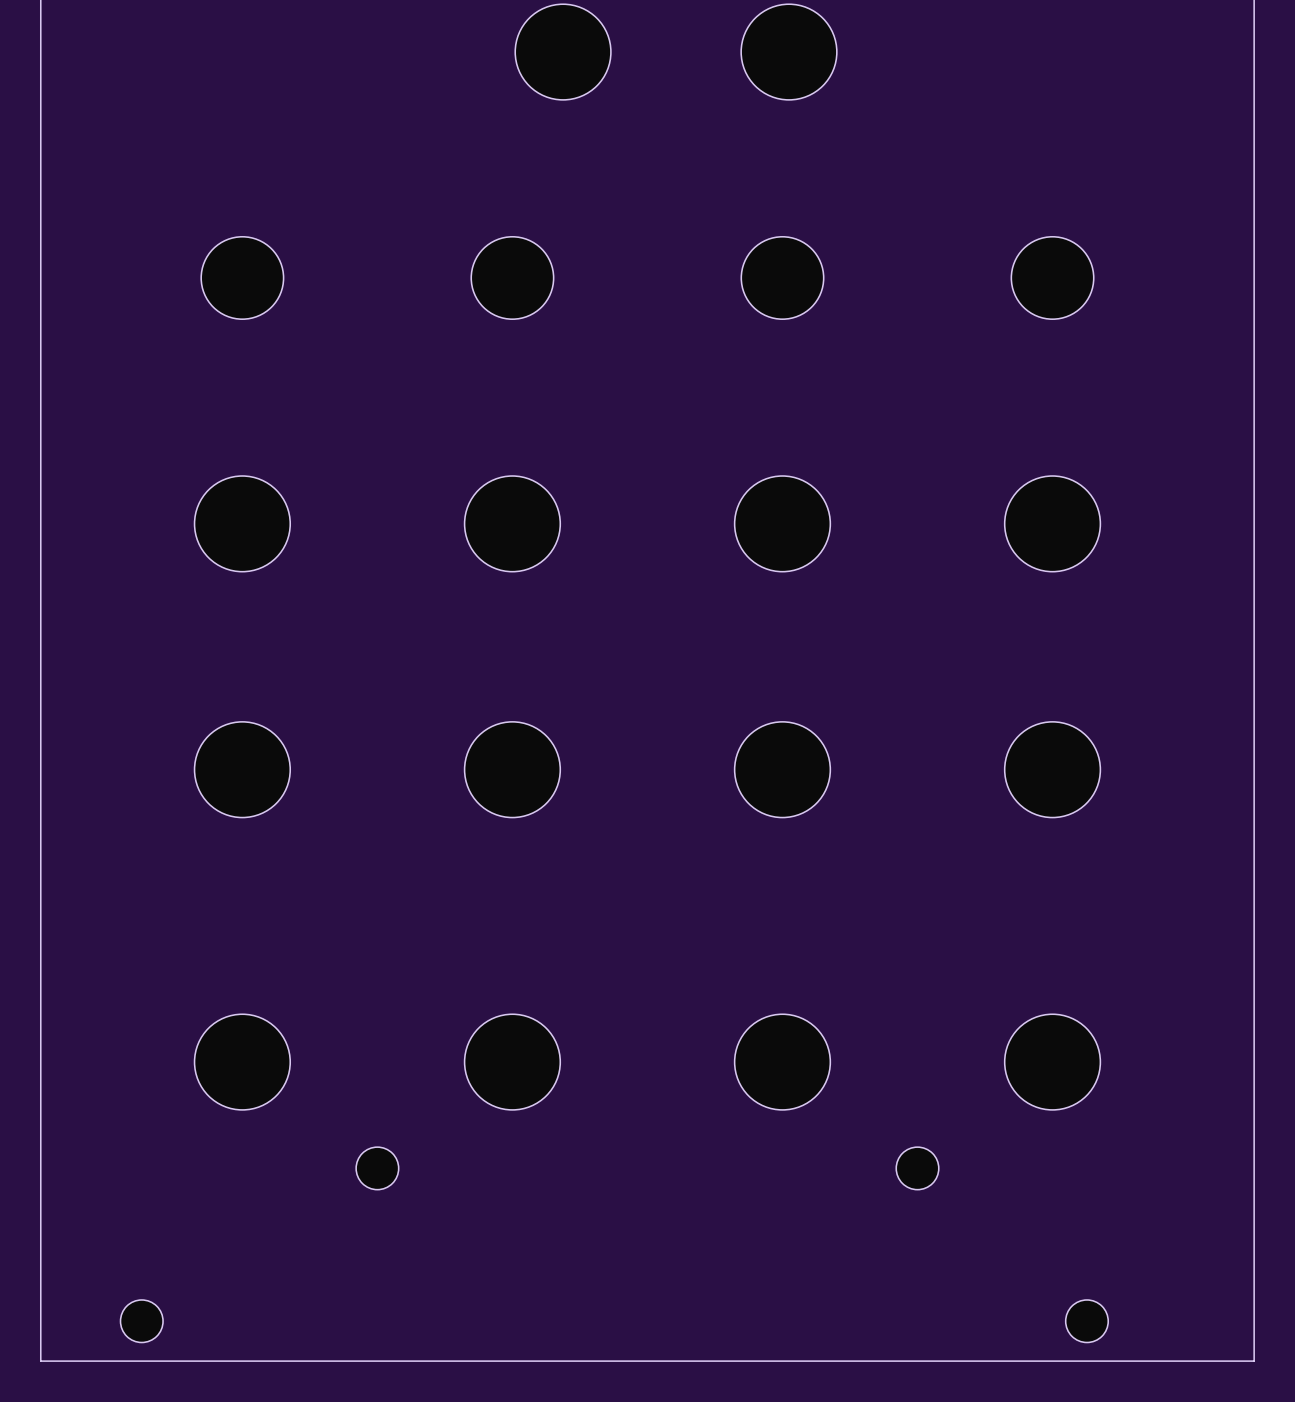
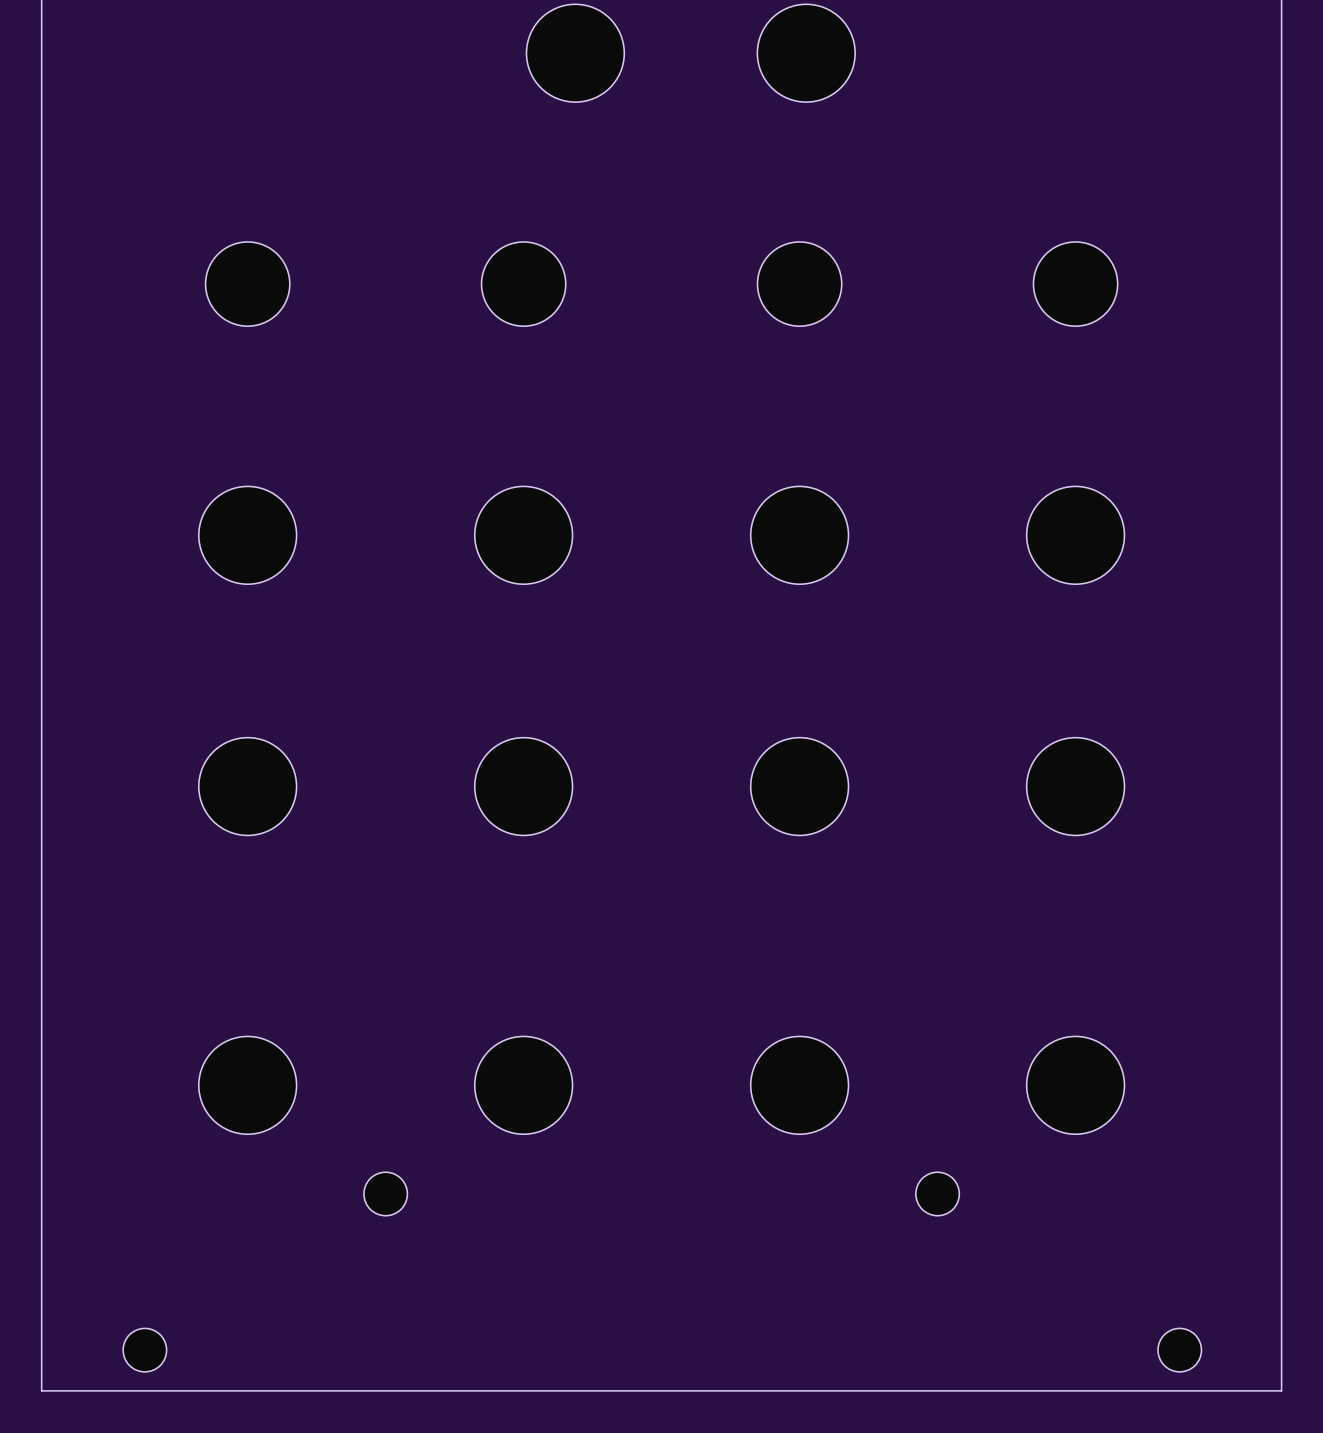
part position: (1086, 1321) -> (1179, 1350)

